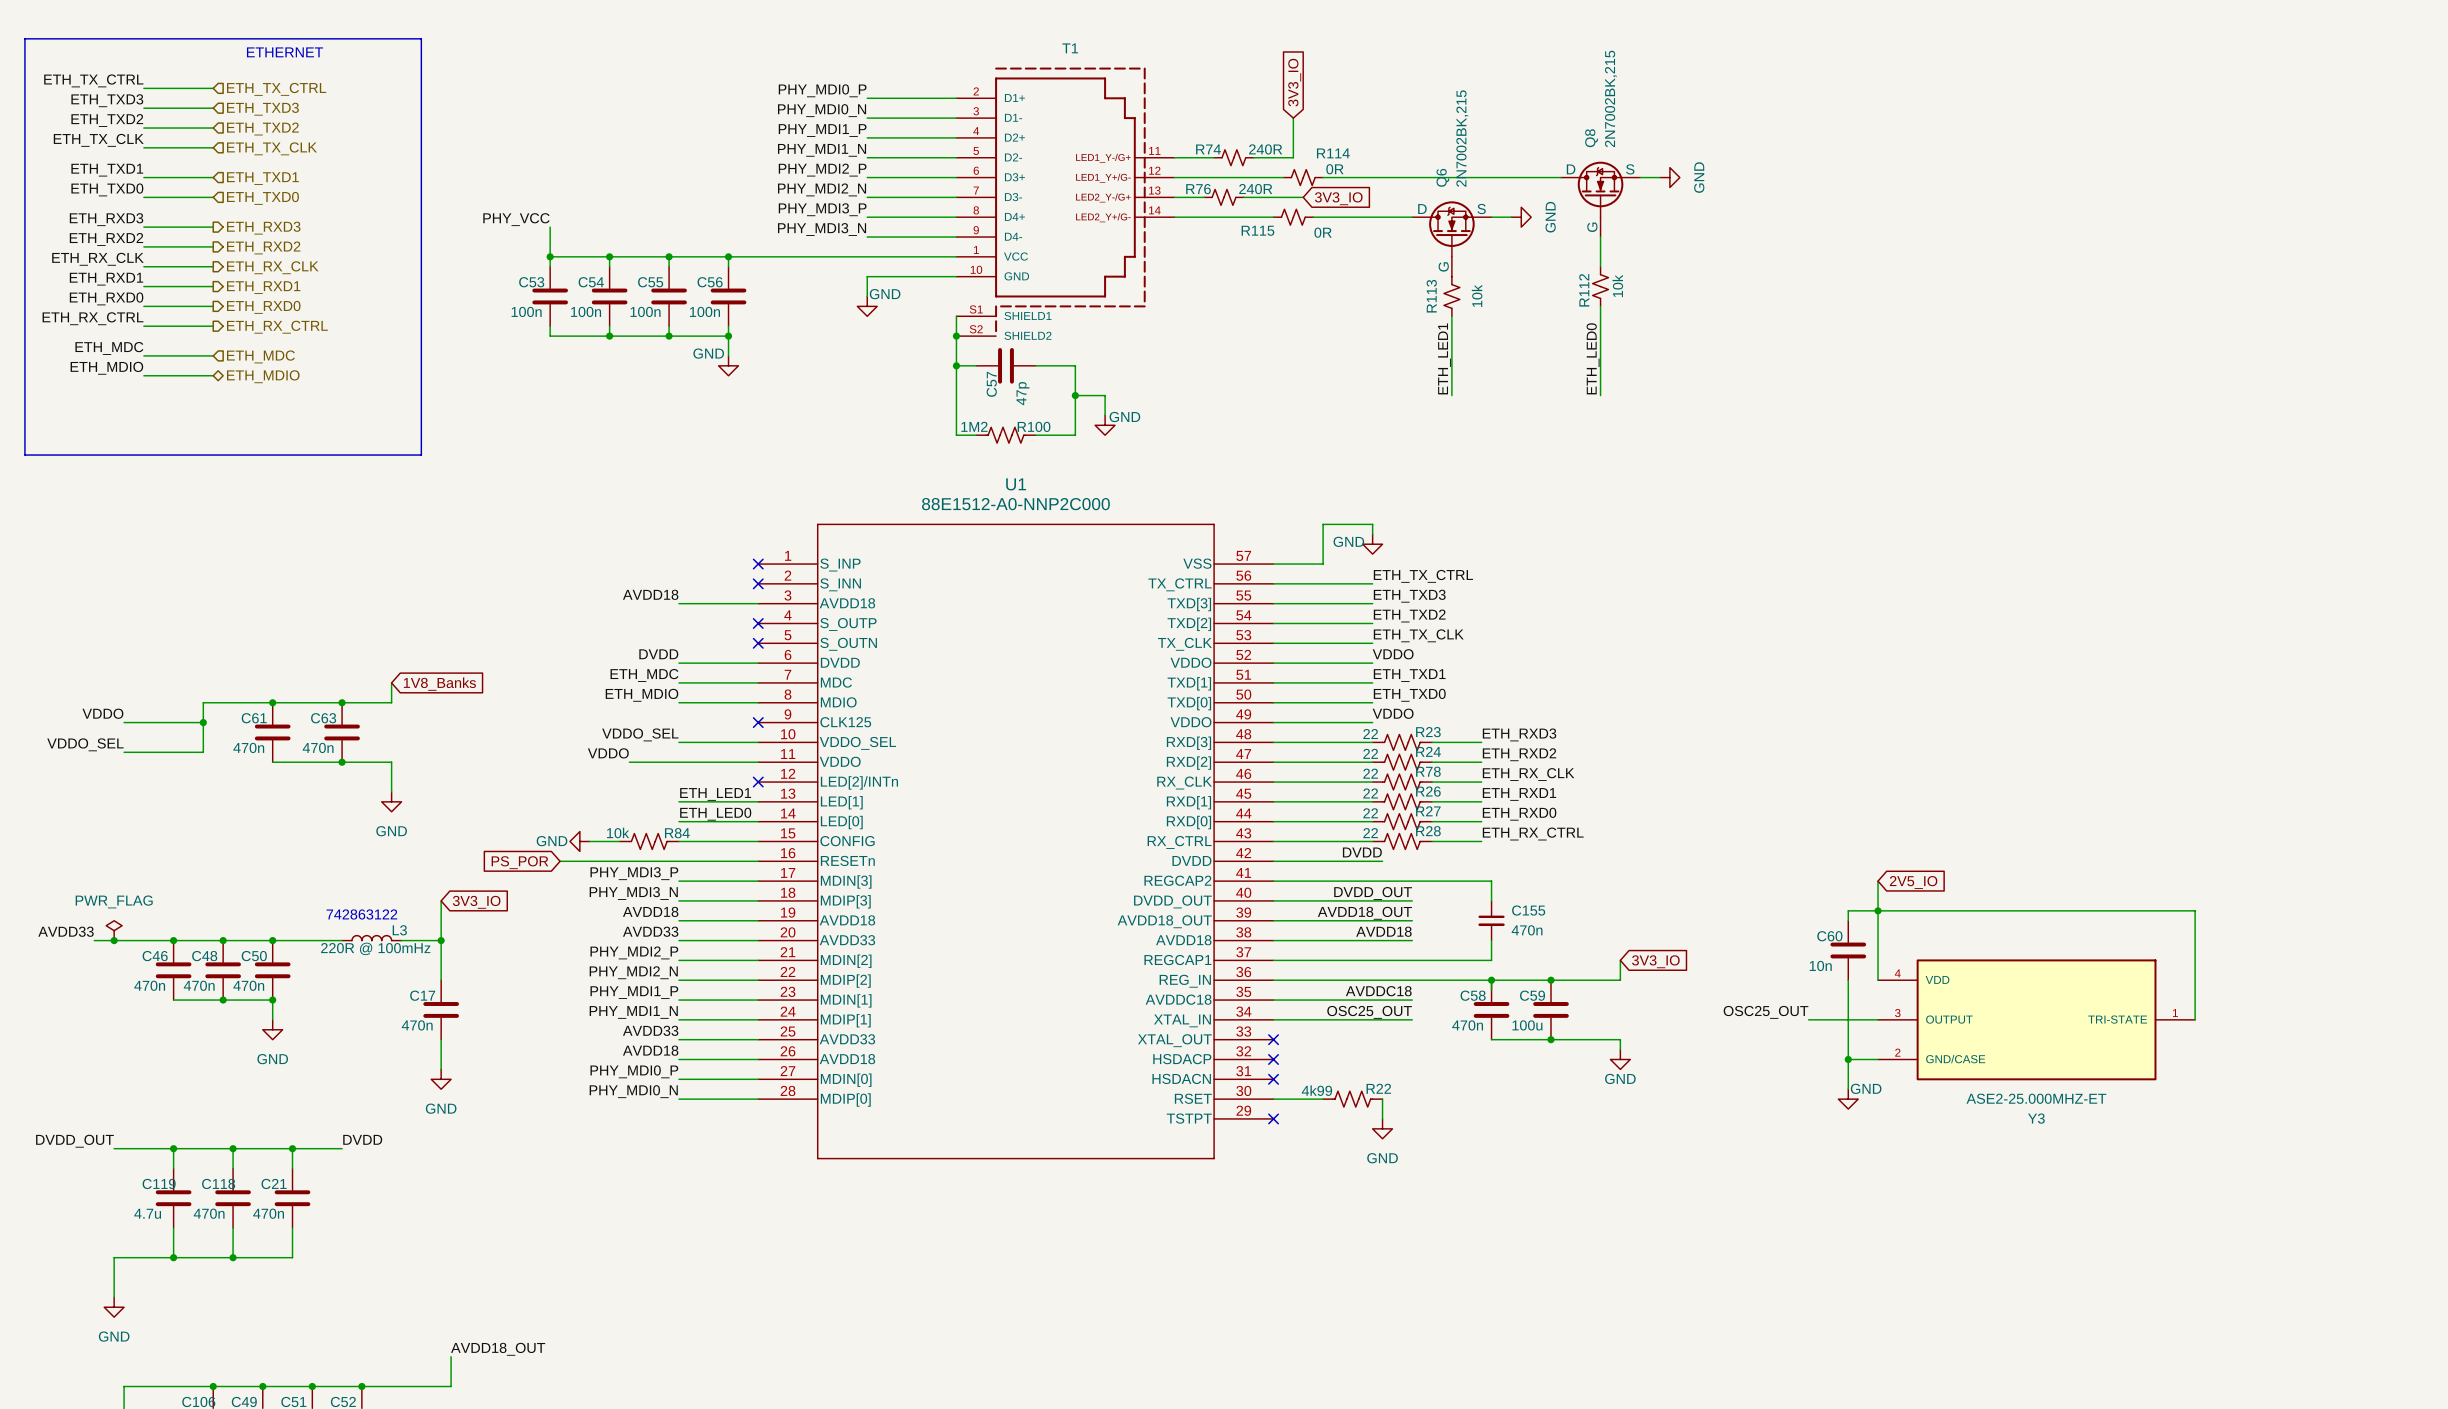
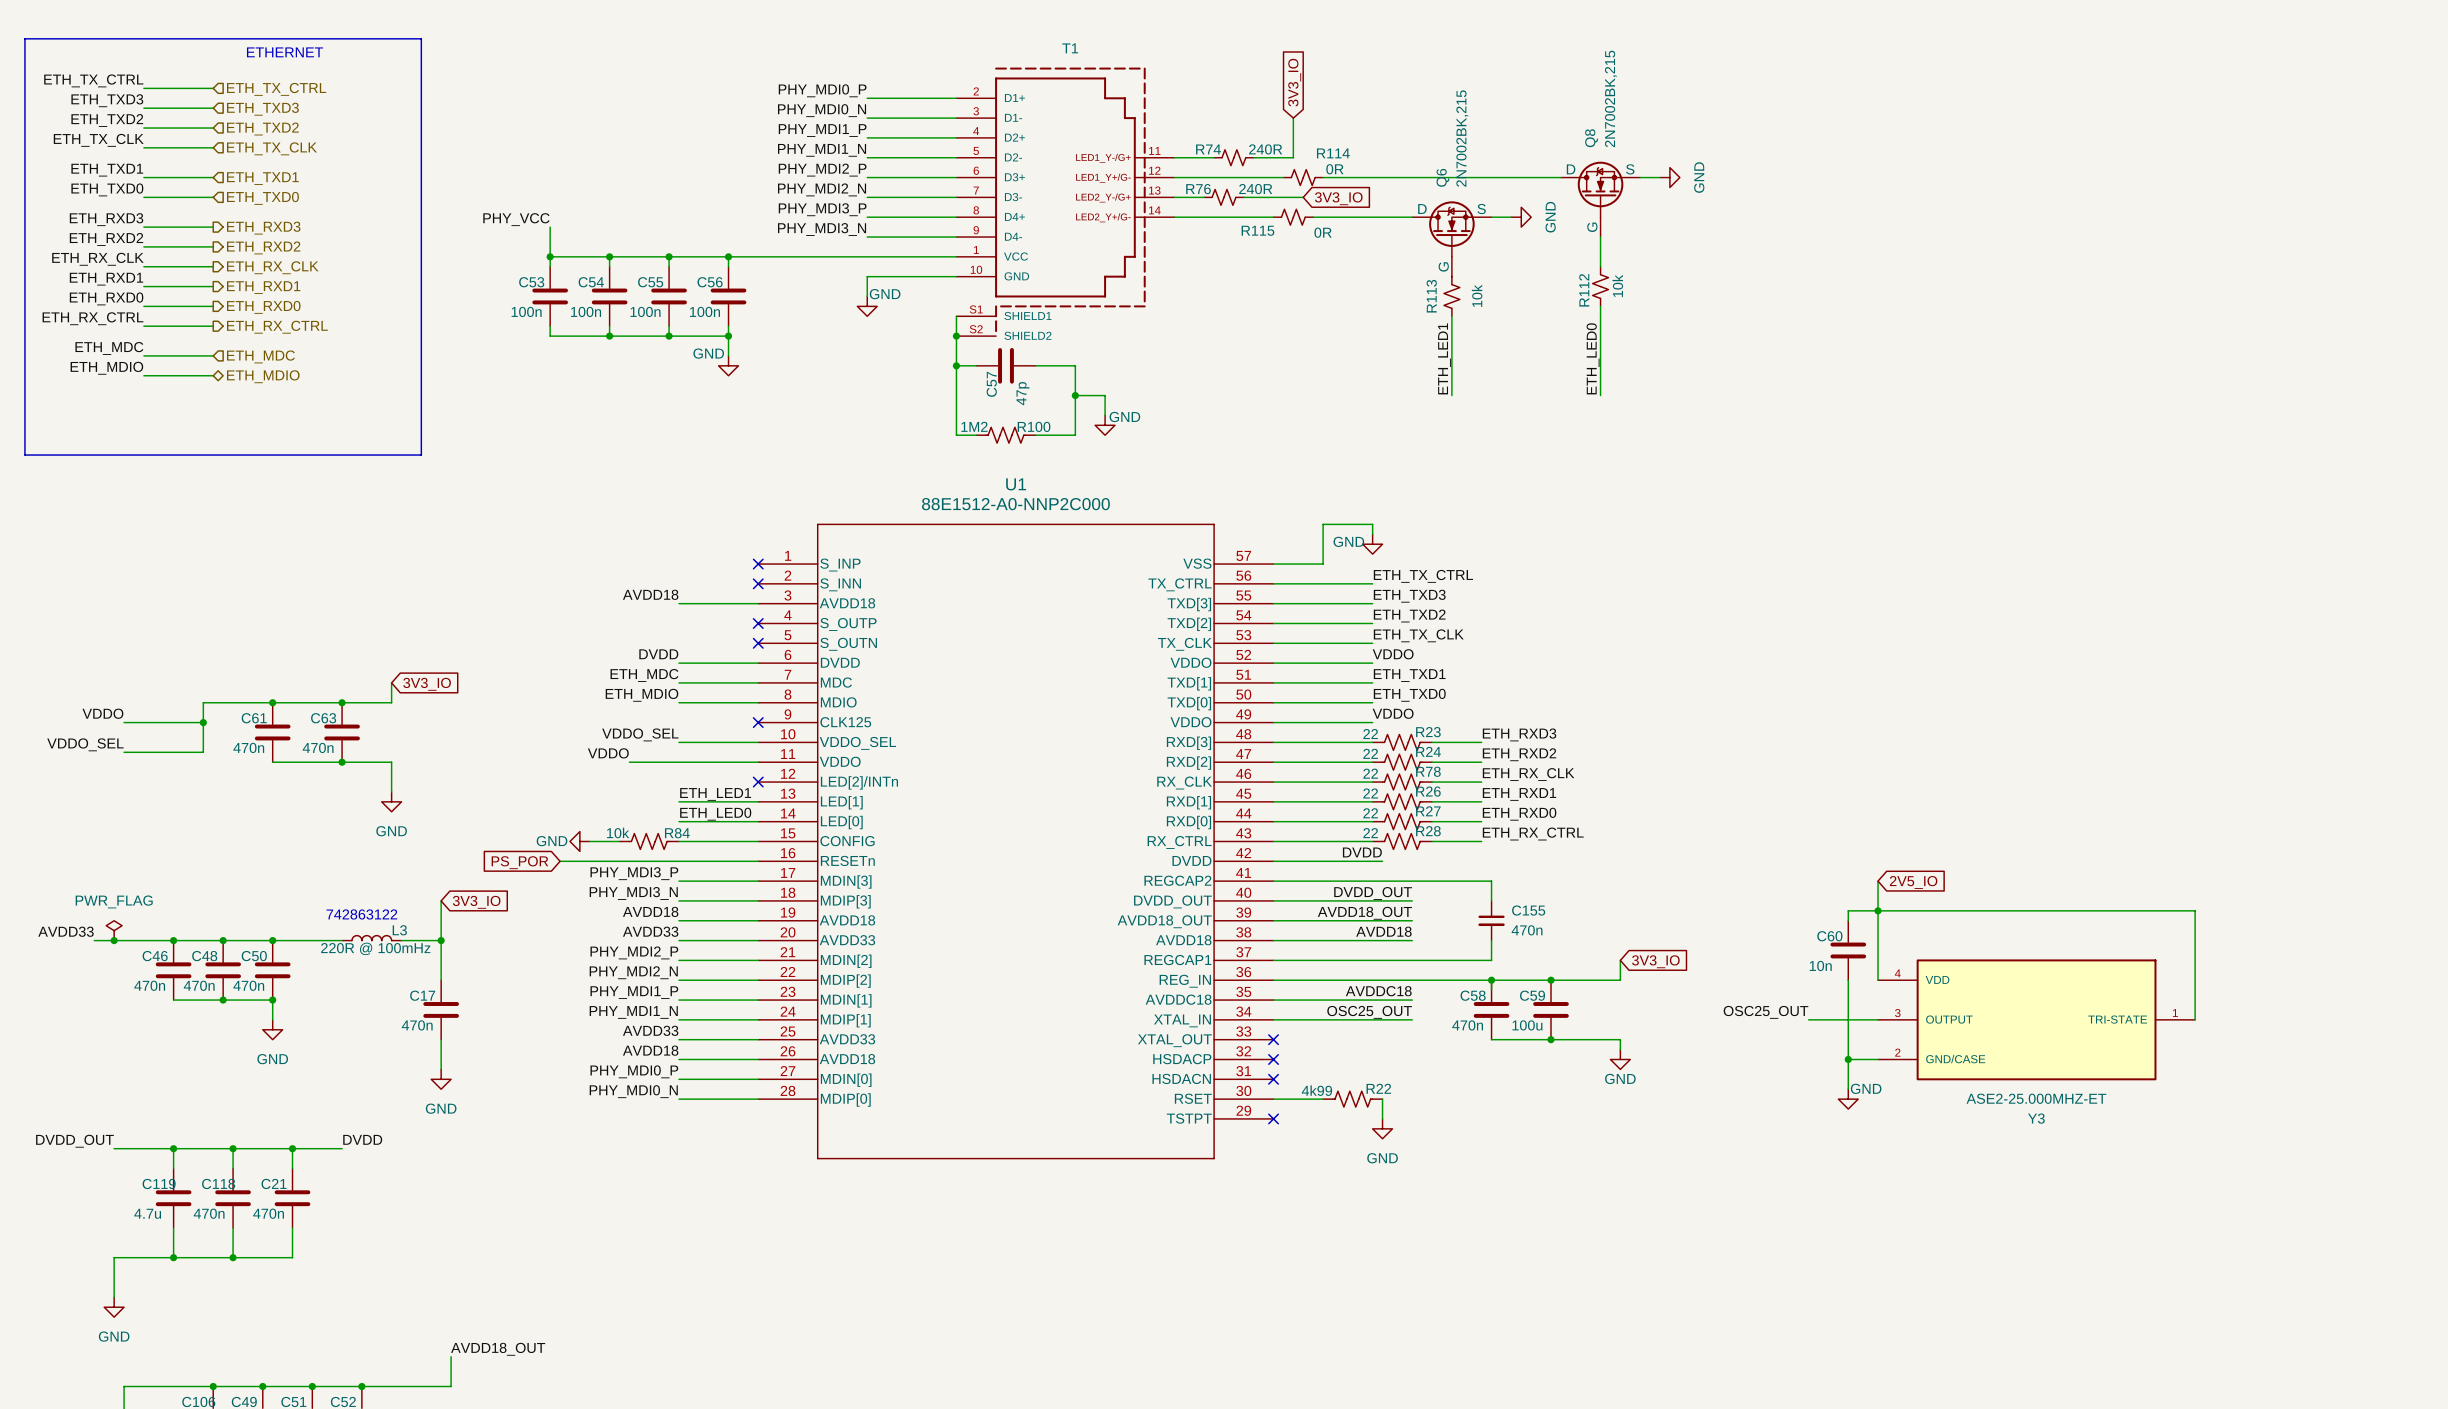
global label: 1V8_Banks (439, 684) -> 3V3_IO (427, 684)

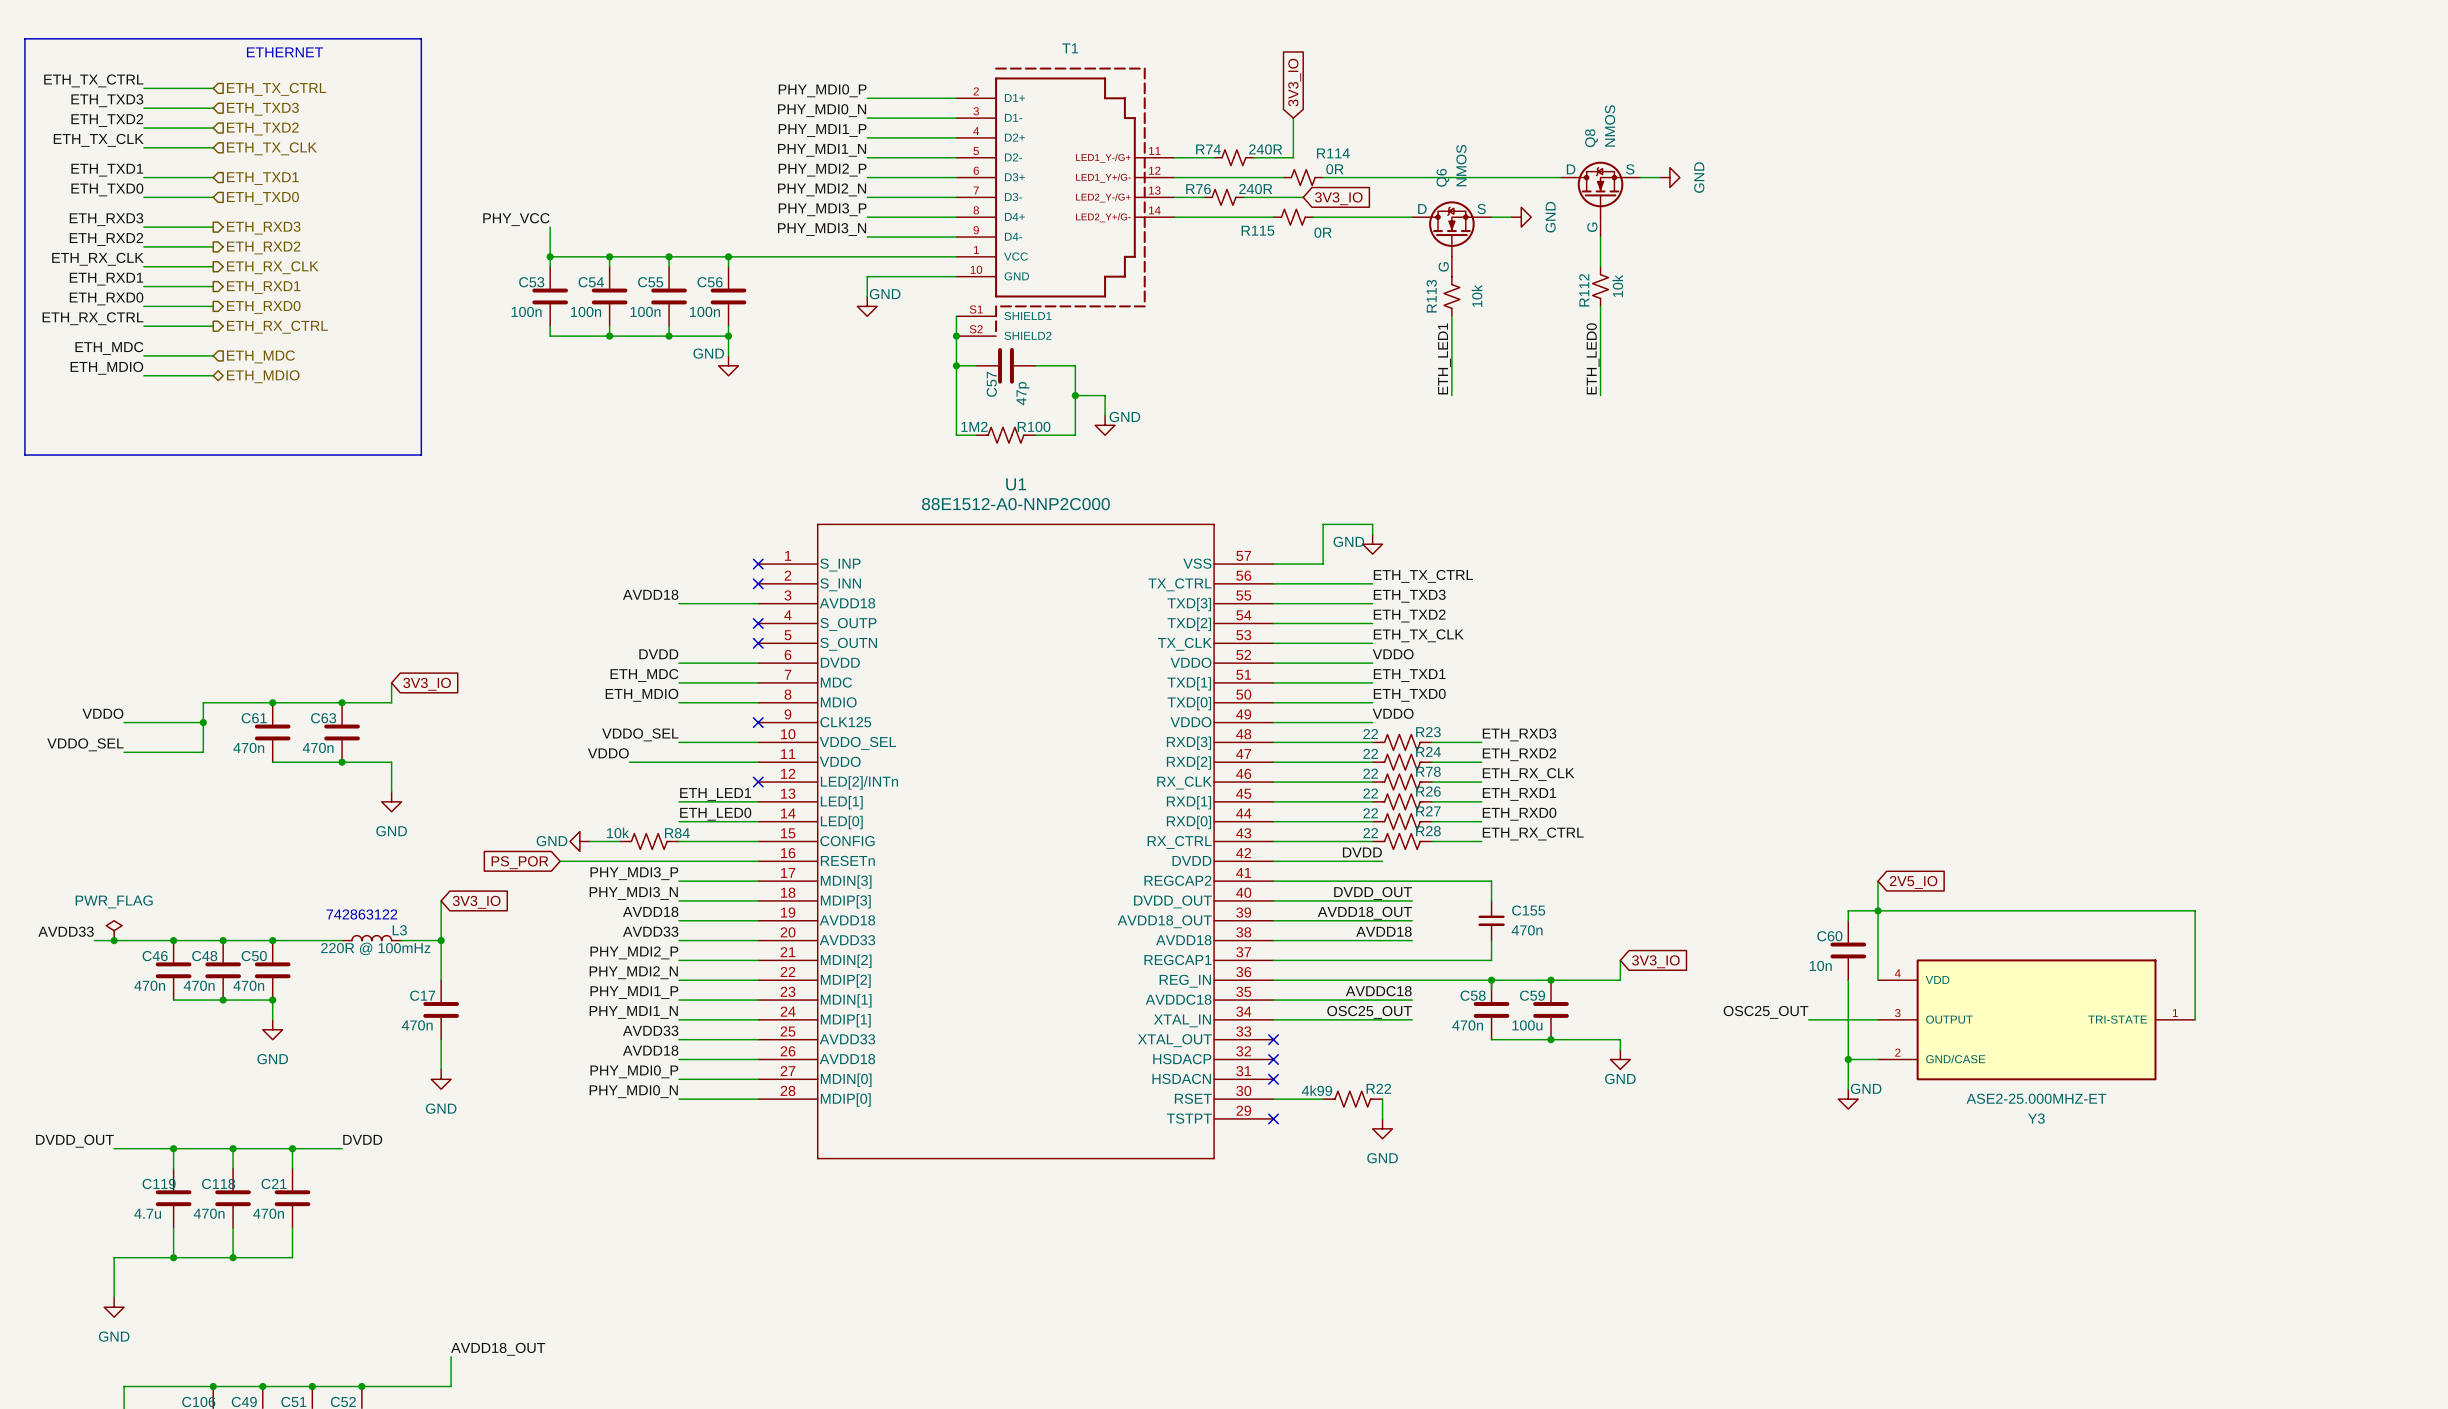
Q8 value: 2N7002BK,215 (1610, 98) -> NMOS (1610, 125)
Q6 value: 2N7002BK,215 (1462, 138) -> NMOS (1461, 165)

